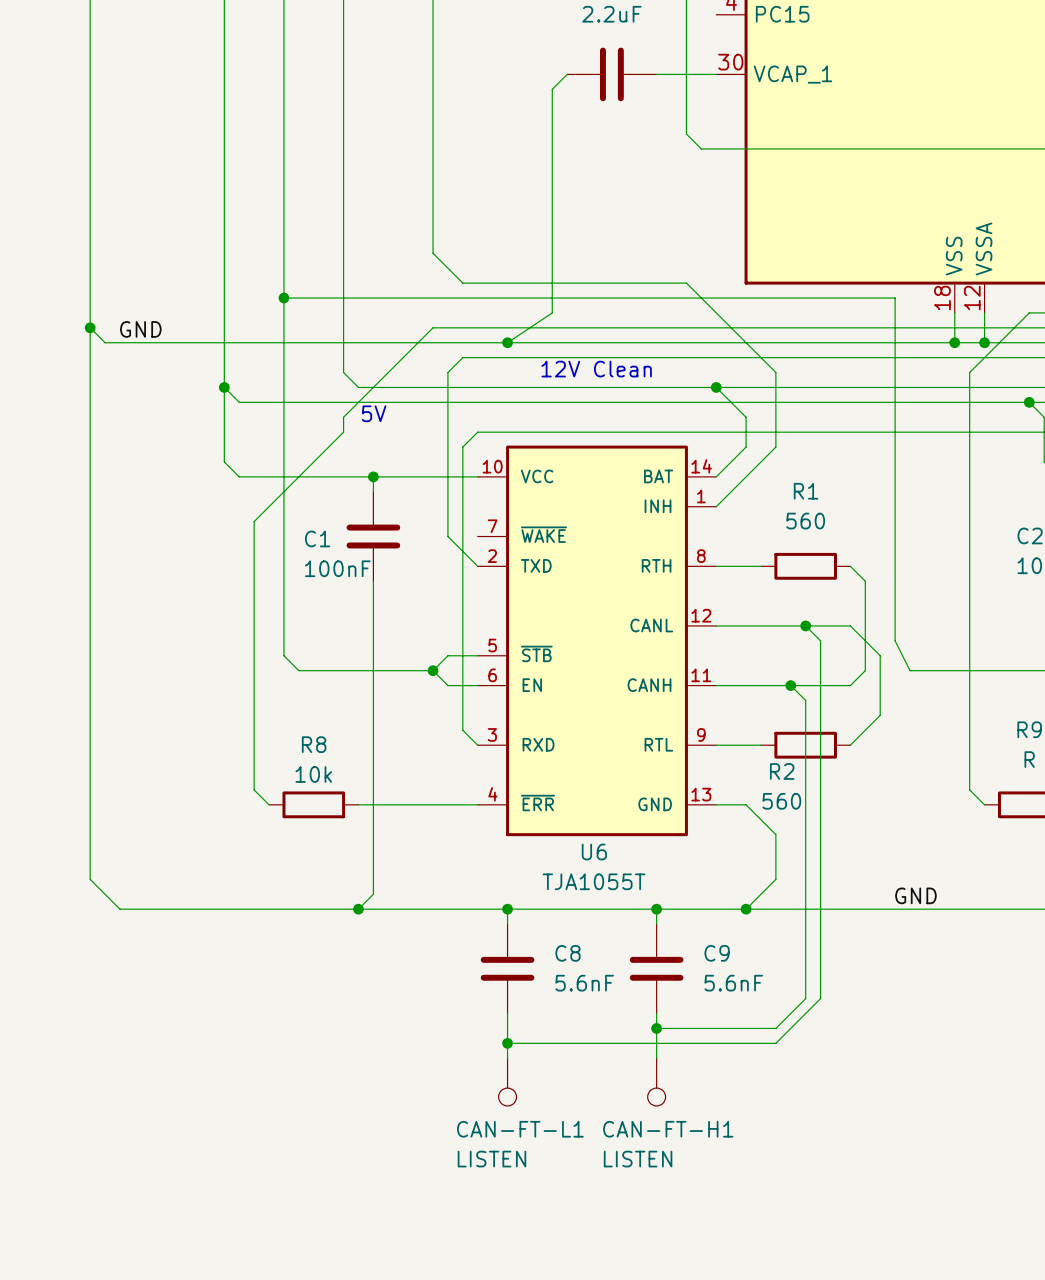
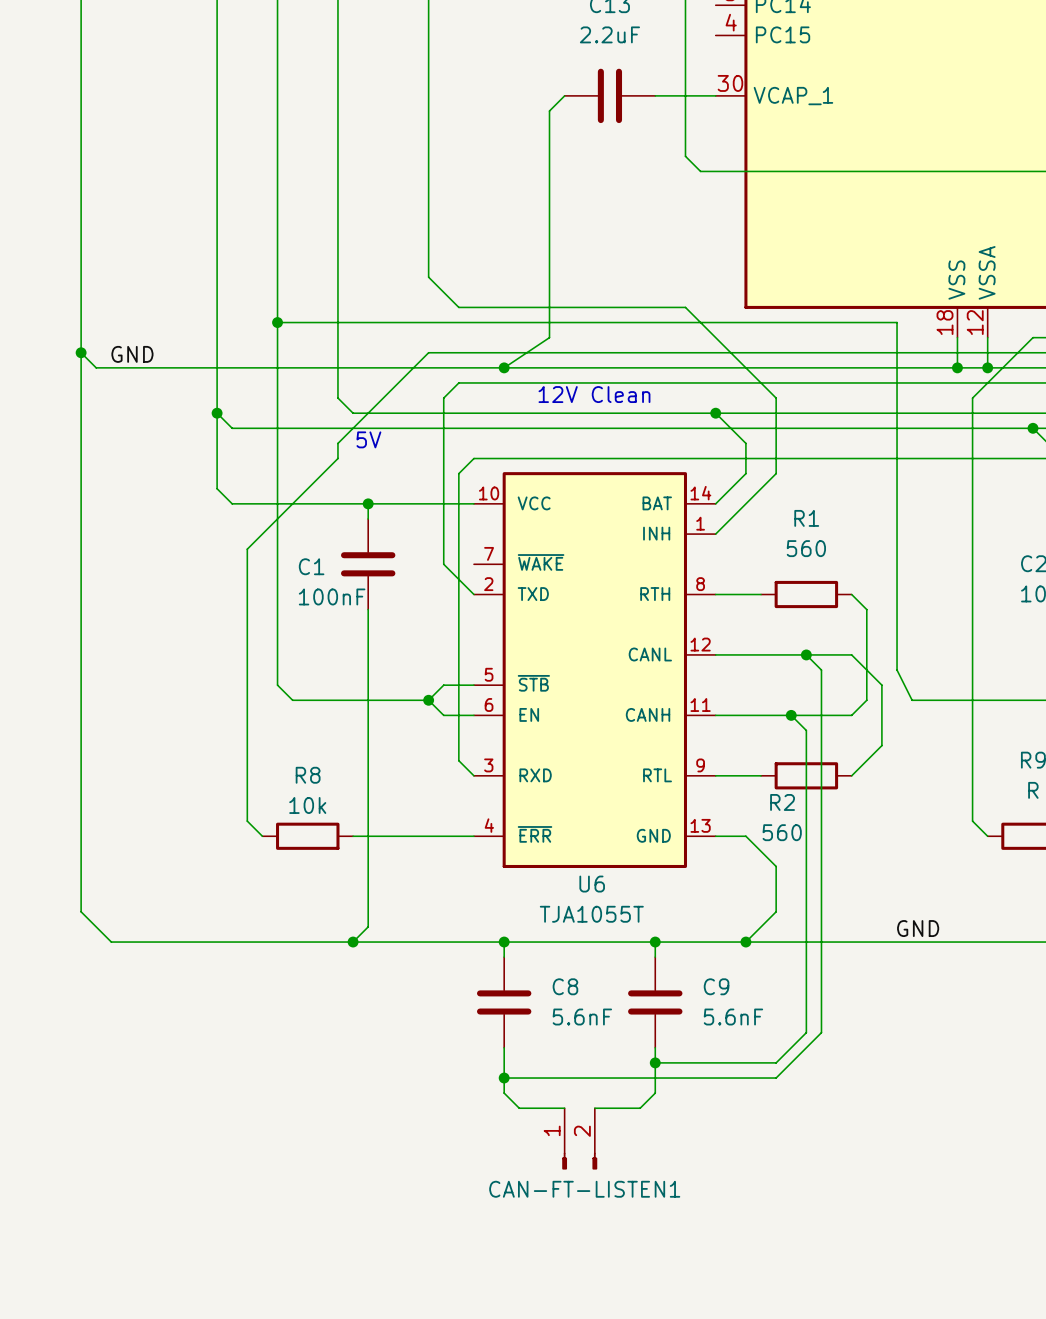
wire: none -> (504, 1093) (519, 1108) (564, 1108)
wire: none -> (655, 1093) (640, 1108) (594, 1108)
CAN-FT-L1: LISTEN (507, 1082) -> none
CAN-FT-H1: LISTEN (656, 1082) -> none
CAN-FT-LISTEN1: none -> (579, 1138)

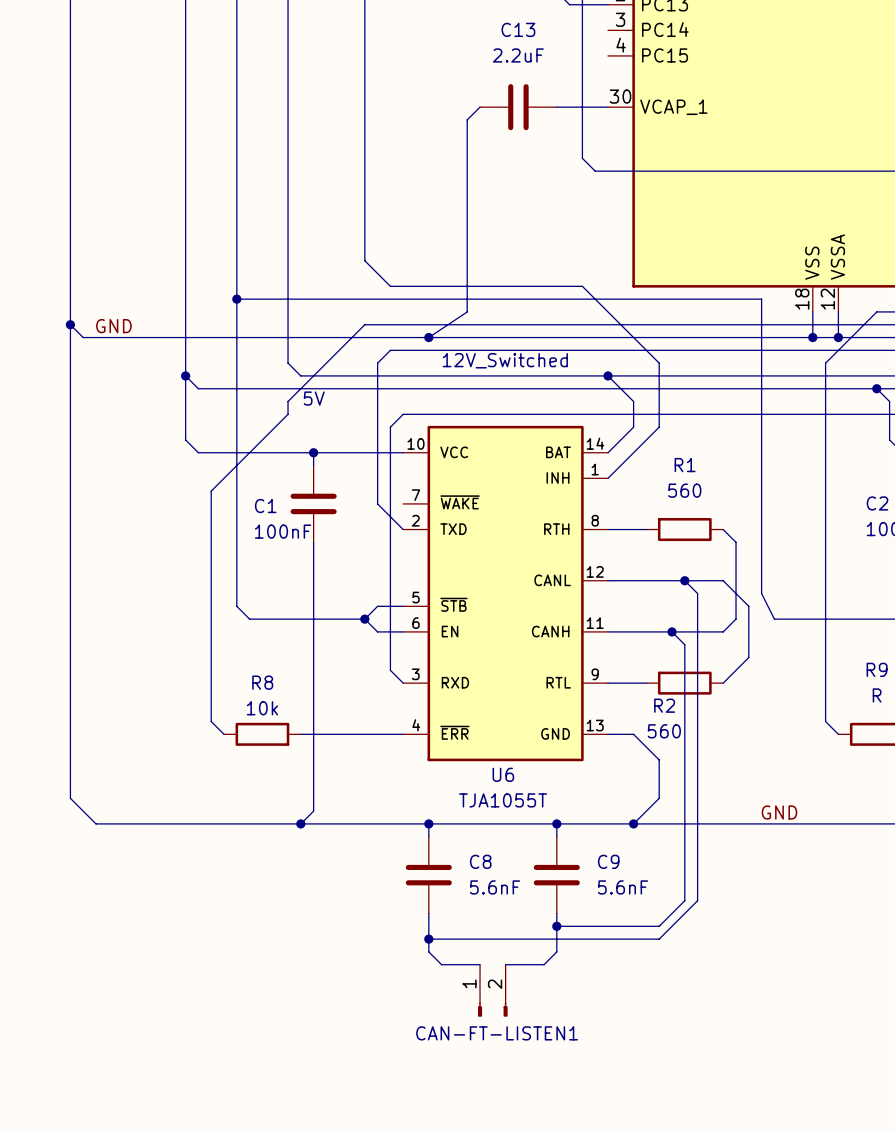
text: 12V Clean (594, 394) -> 12V_Switched (505, 360)

